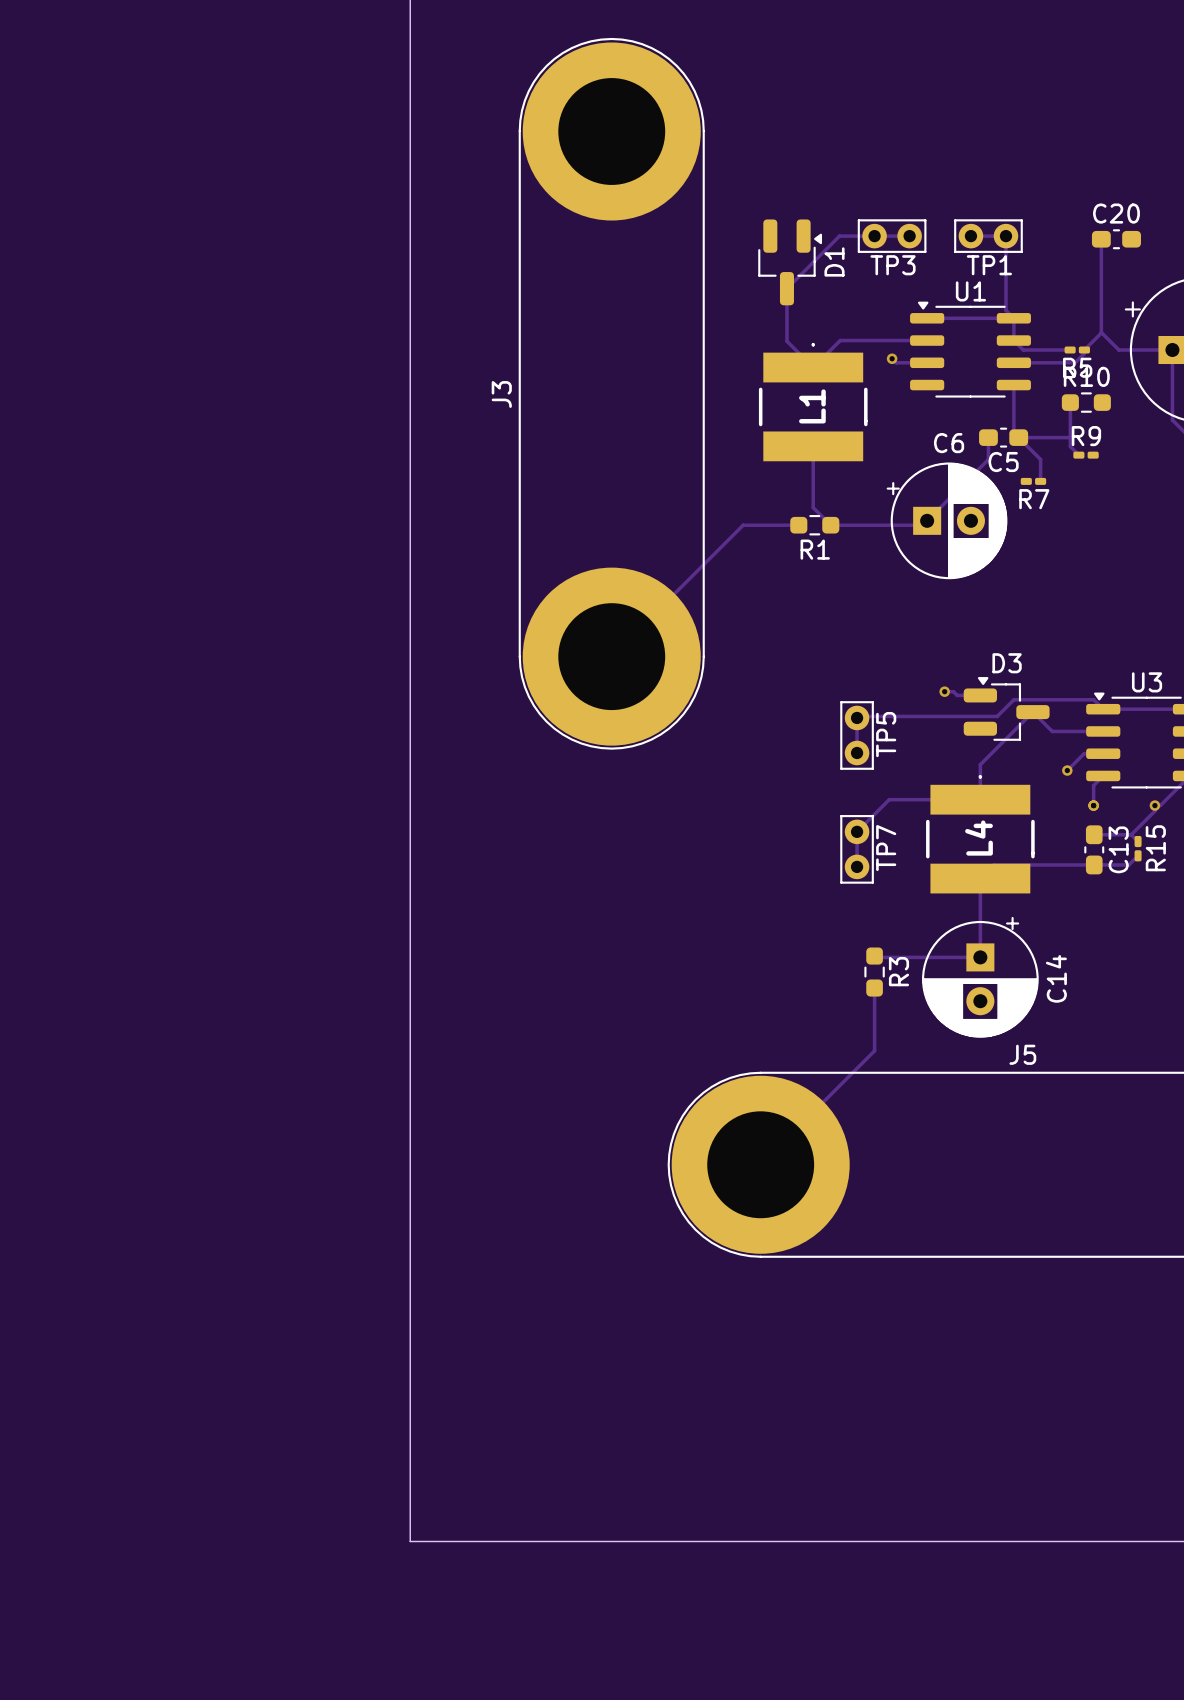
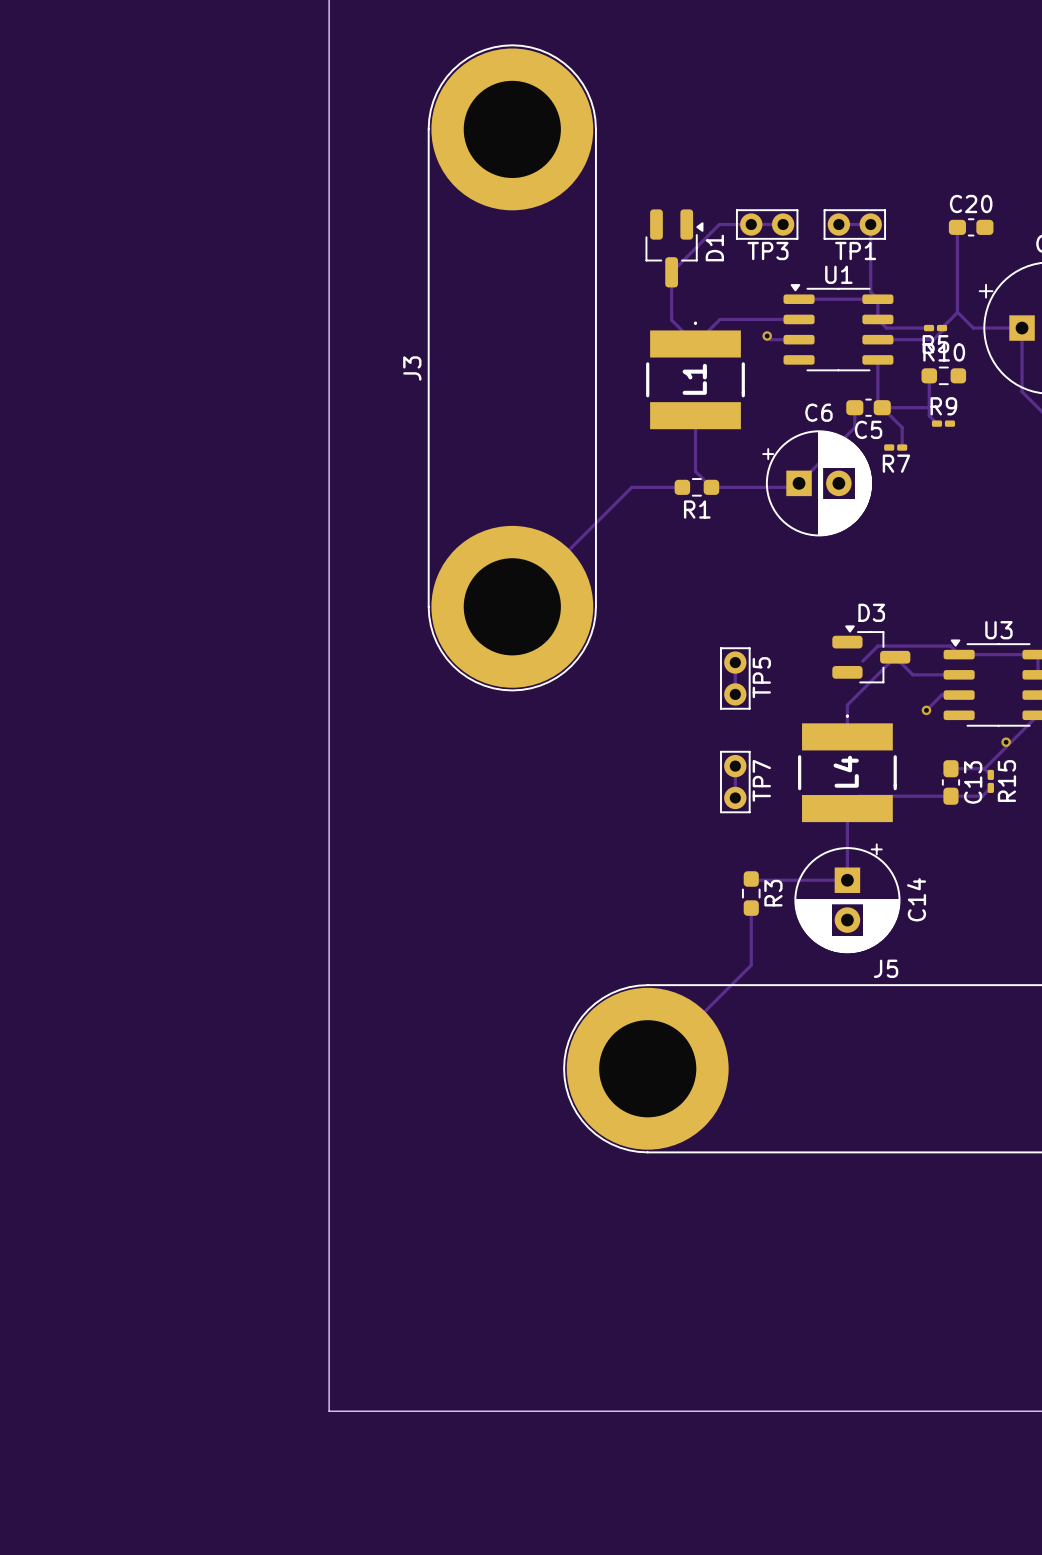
track: (944, 691) (953, 691) (957, 695) (980, 695) -> none
via: (944, 691) -> none
track: (858, 716) (997, 716) -> none
track: (1103, 775) (1093, 785) (1093, 805) -> none
track: (980, 799) (889, 799) (857, 831) -> none
via: (1093, 805) -> none

